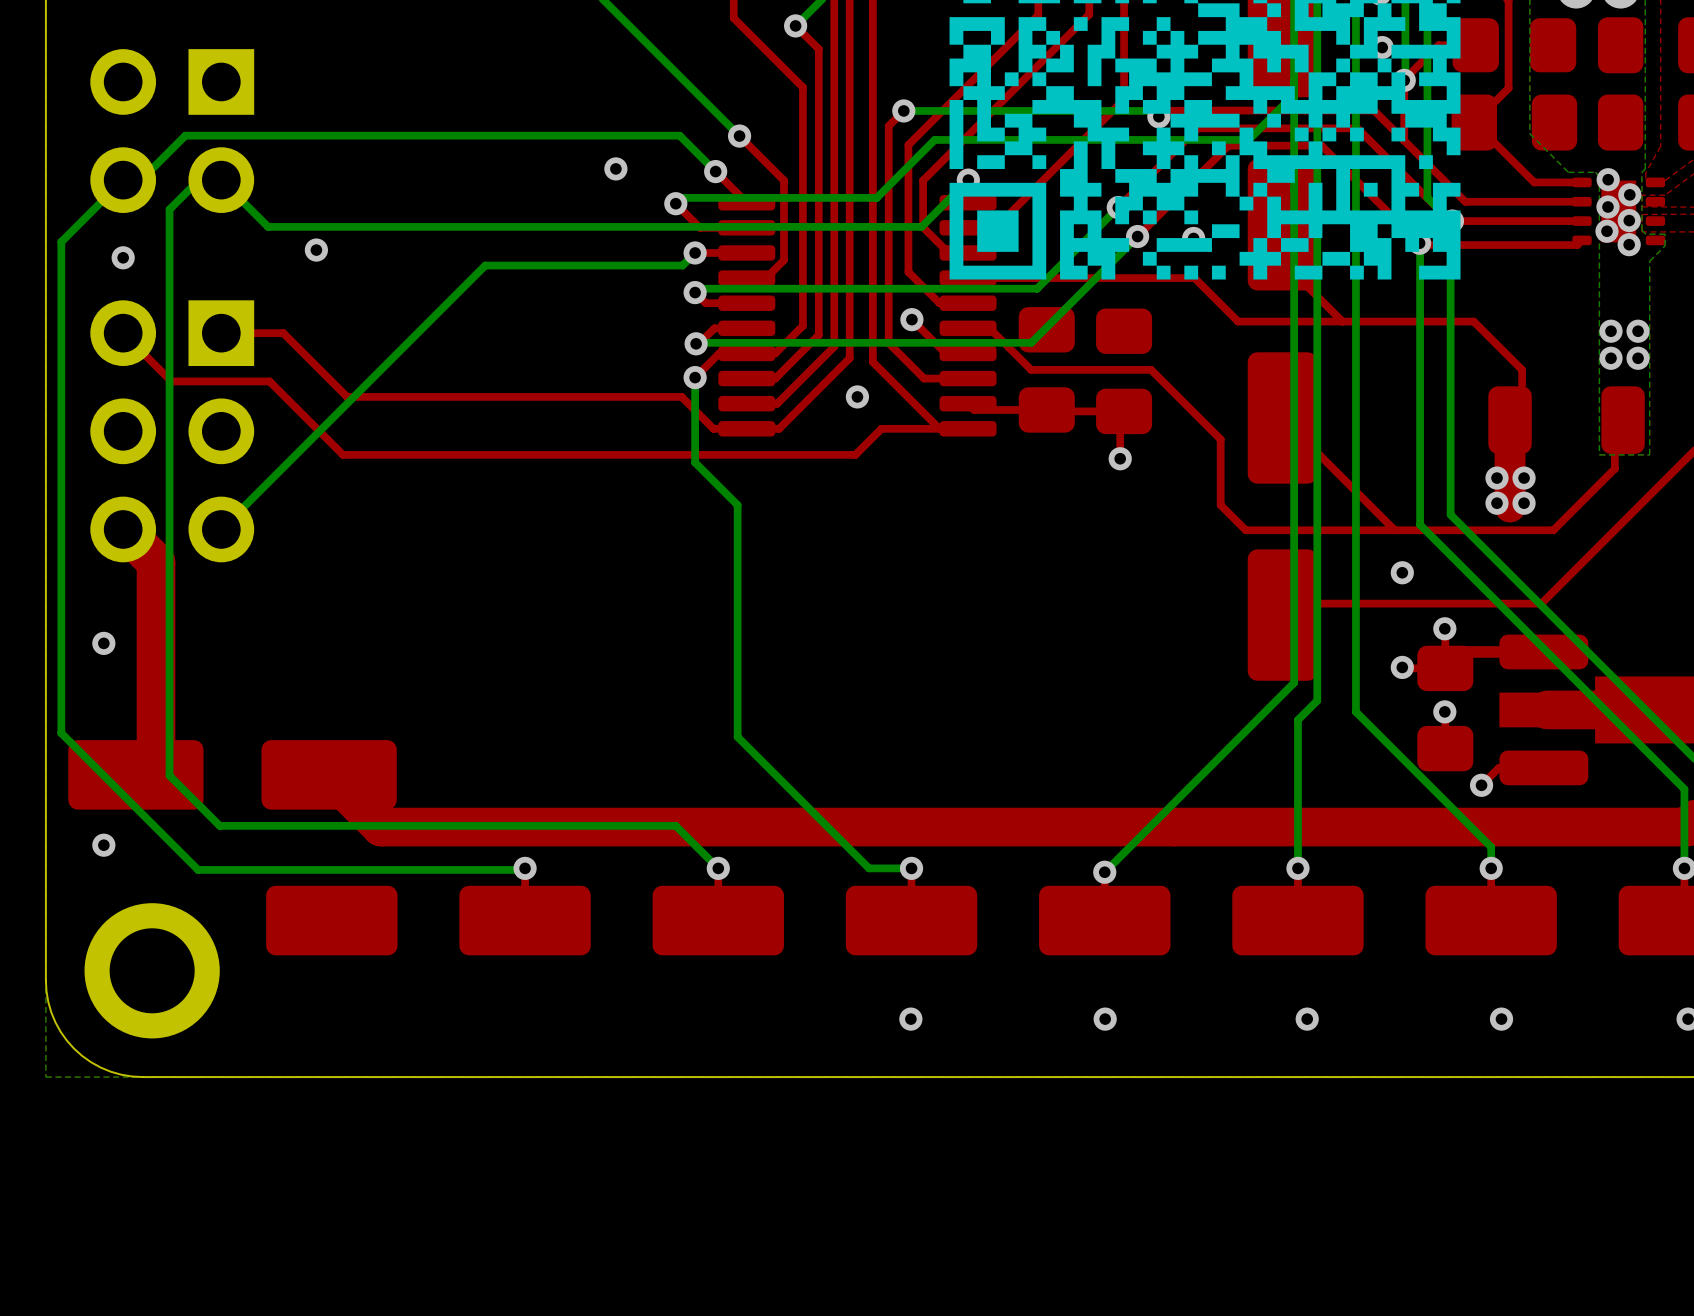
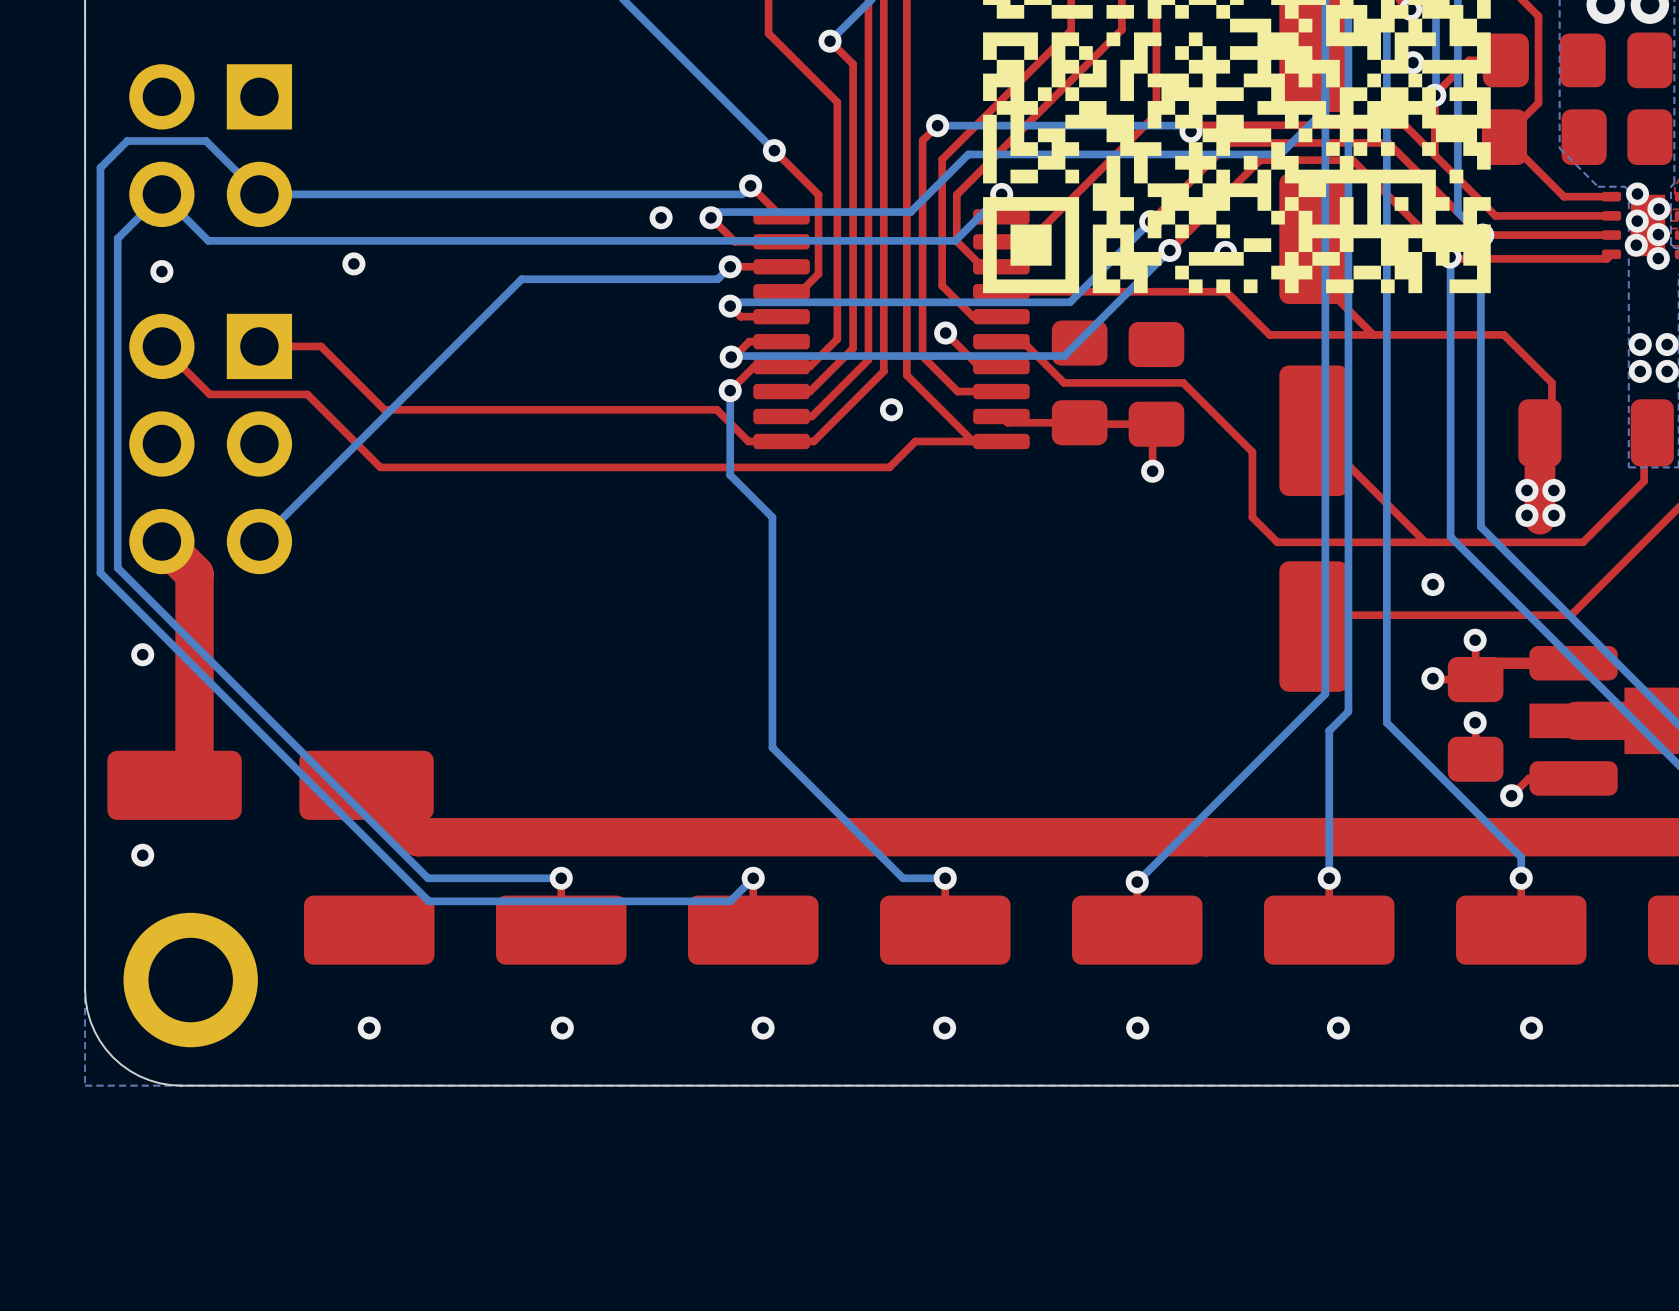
via position: (615, 168) -> (661, 217)
bottom track: (715, 171) (679, 135) (185, 135) (140, 180) (123, 180) -> (750, 185) (742, 194) (259, 194) (206, 141) (127, 141) (100, 167) (100, 255)
bottom track: (78, 224) (61, 241) -> (117, 238) (117, 568) (428, 878) (561, 878)
bottom track: (268, 226) (221, 180) (198, 180) (169, 209) (169, 775) (219, 825) (675, 825) (720, 870) -> (305, 240) (208, 240) (161, 194)
bottom track: (61, 561) (61, 733) (198, 869) (526, 869) -> (100, 573) (428, 901) (730, 901) (753, 878)
via: none -> (369, 1028)
via: none -> (562, 1028)
via: none -> (763, 1028)

